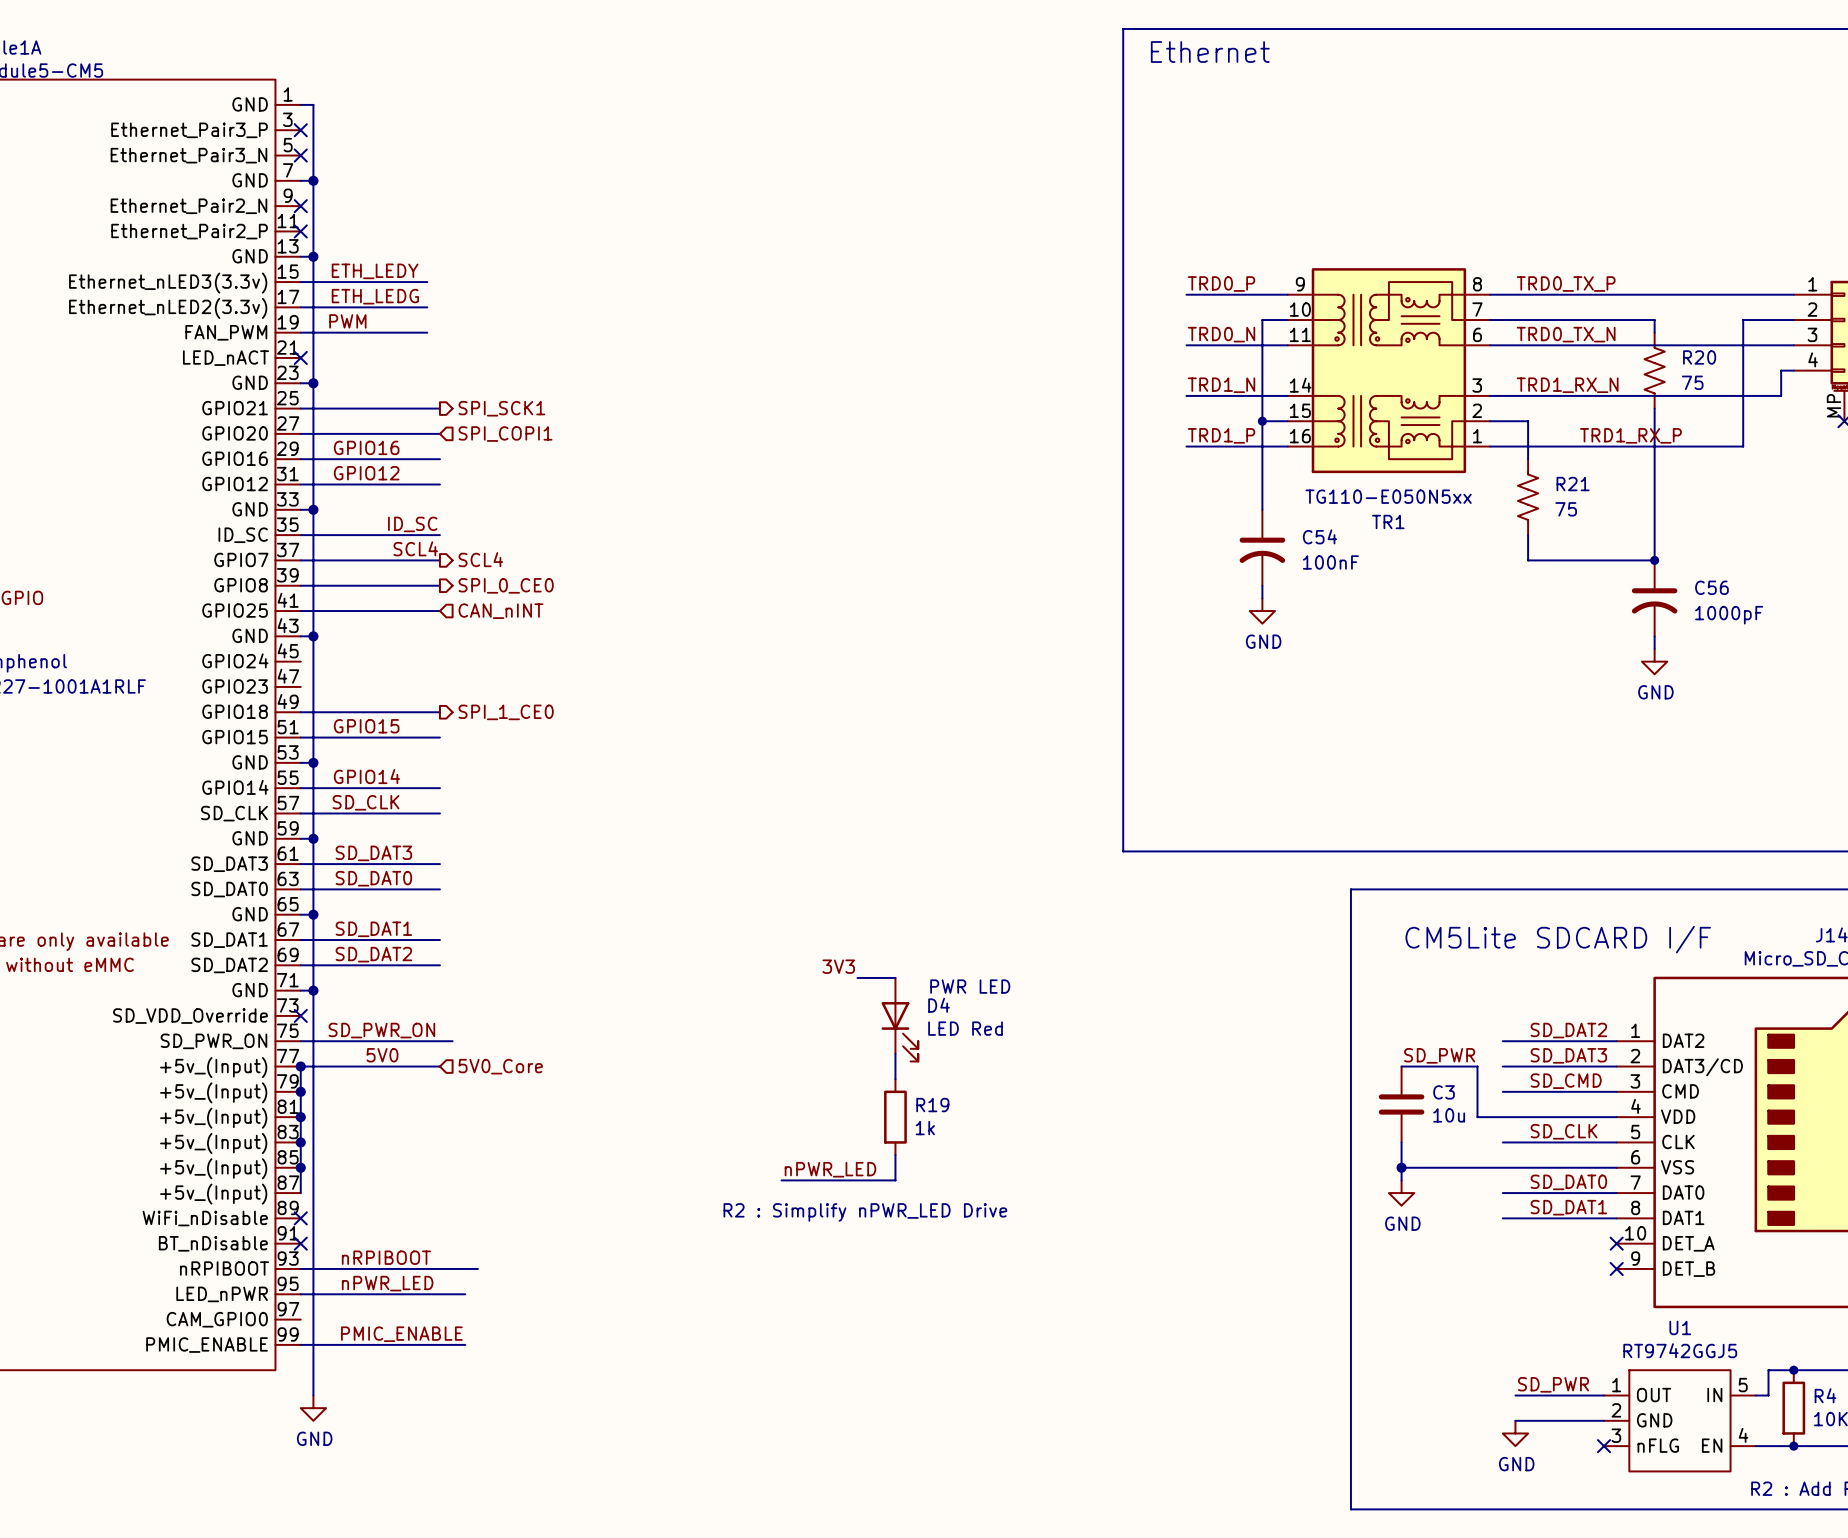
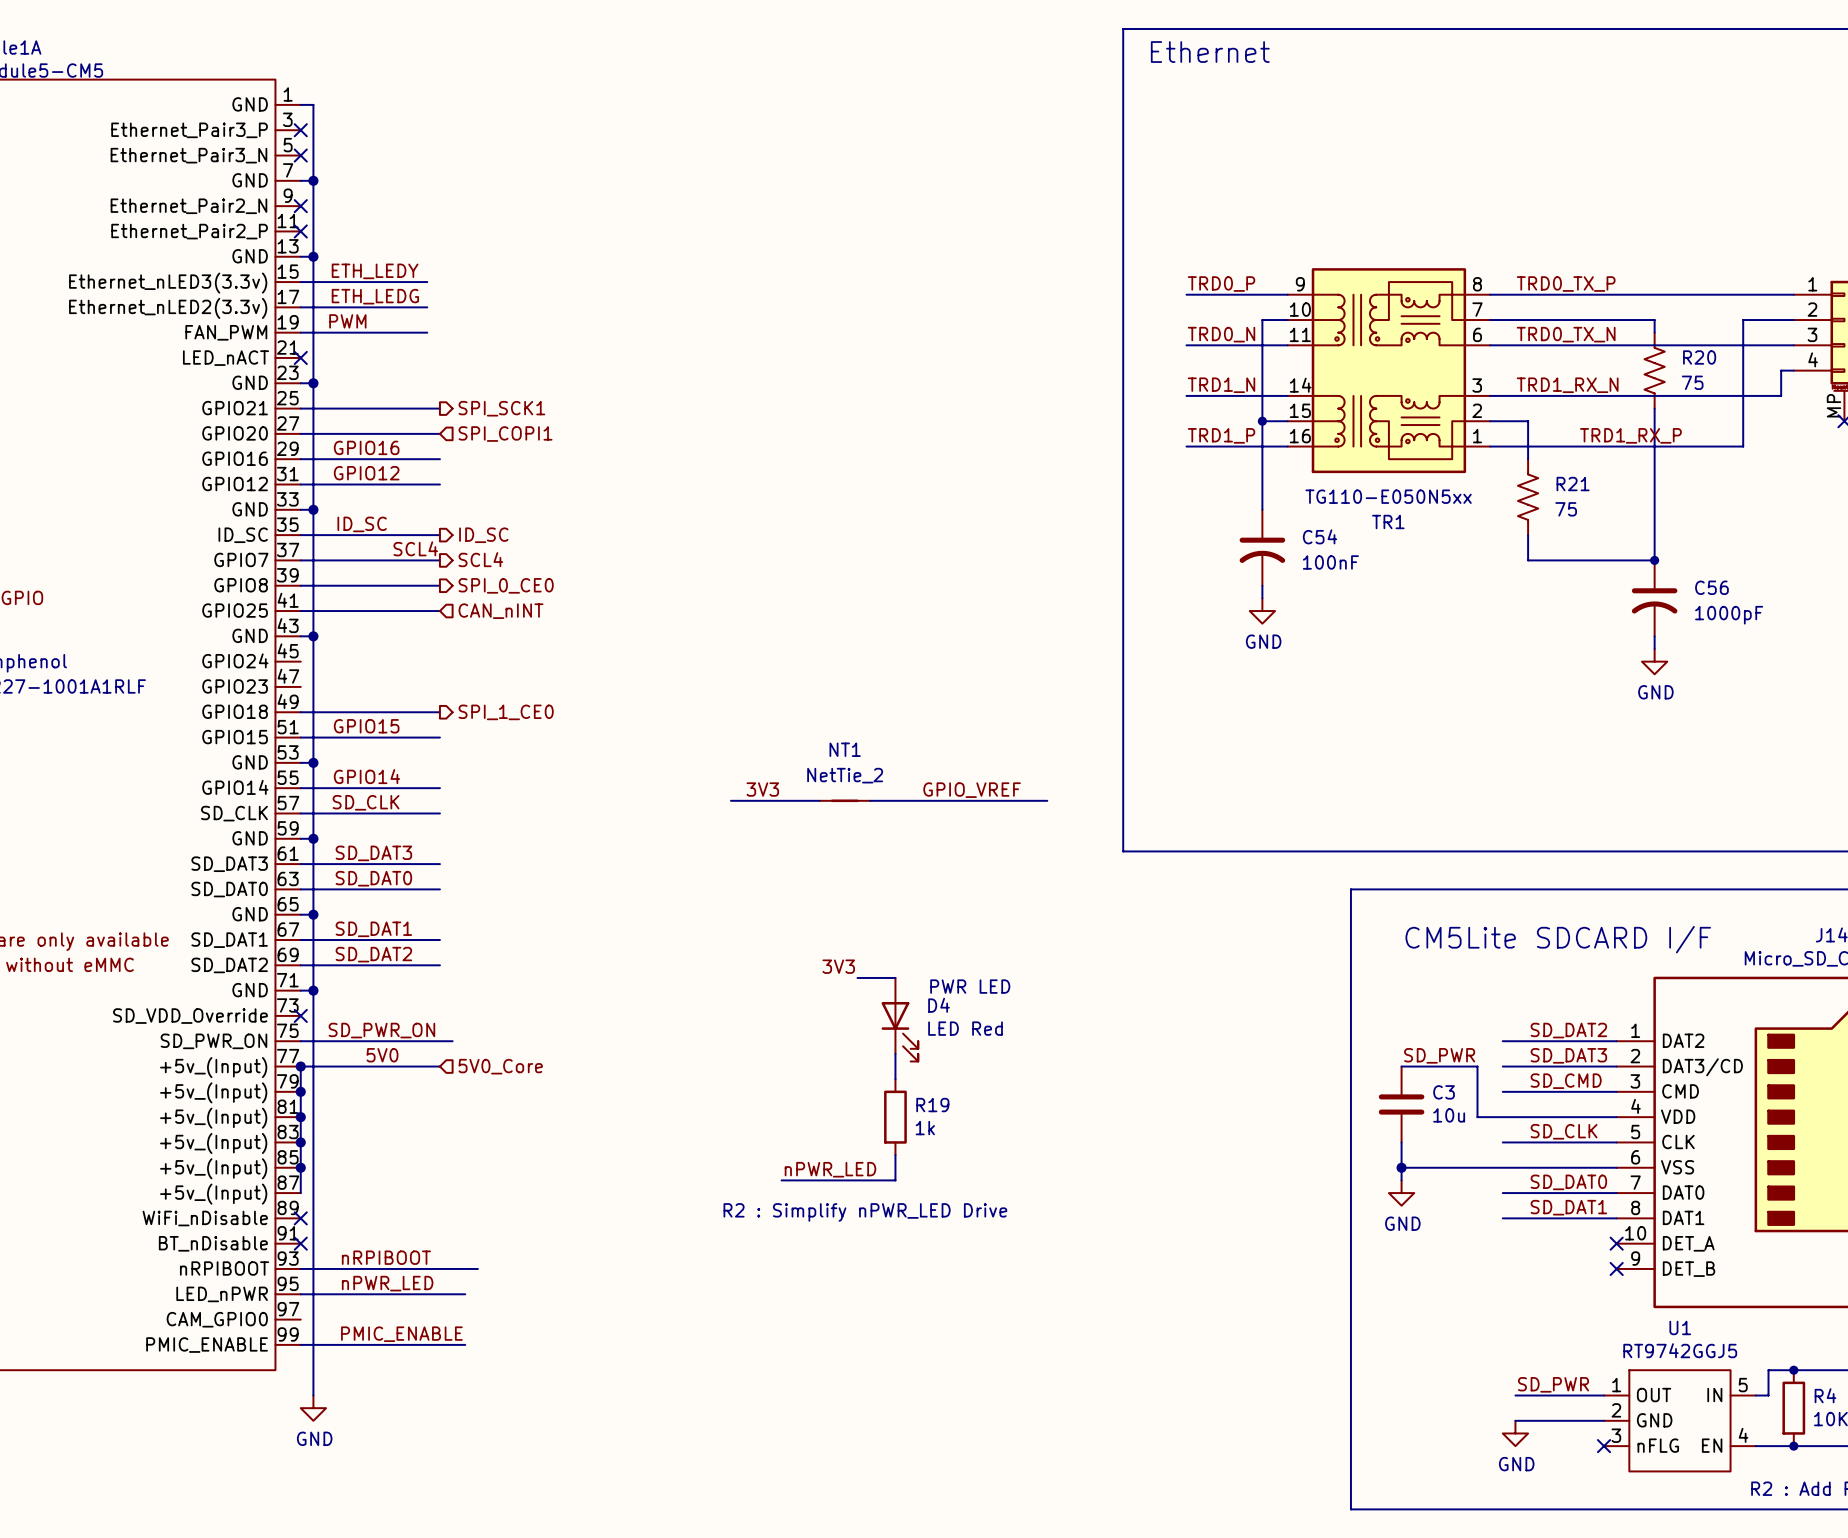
label position: ID_SC (412, 524) -> ID_SC (362, 524)
hierarchical label: none -> ID_SC (483, 535)
label: none -> 3V3 (762, 789)
label: none -> GPIO_VREF (972, 790)
wire: none -> (730, 800) (819, 800)
NT1: none -> NetTie_2 (844, 800)
wire: none -> (870, 800) (1047, 800)

